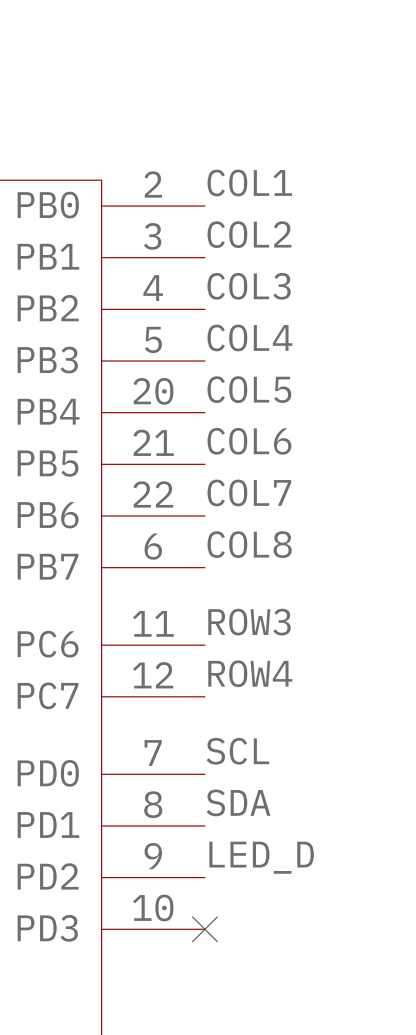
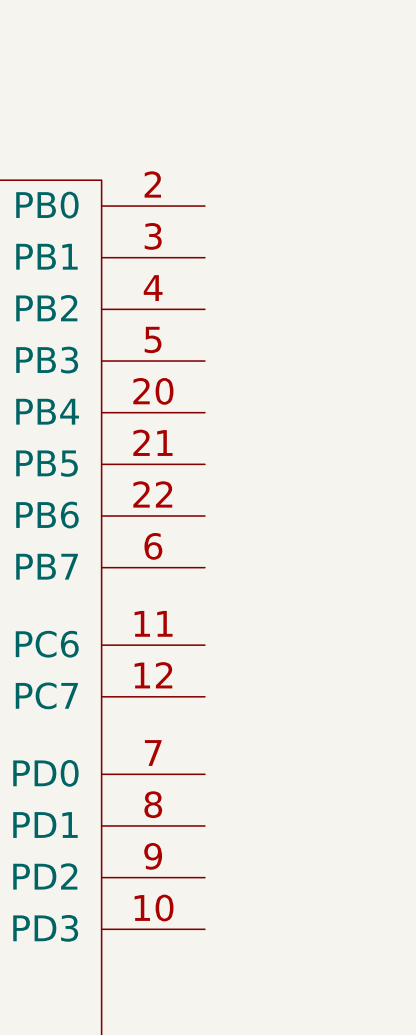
label: COL1 (249, 182) -> none
label: COL2 (249, 234) -> none
label: COL3 (249, 286) -> none
label: COL4 (249, 337) -> none
label: COL5 (249, 389) -> none
label: COL6 (249, 441) -> none
label: COL7 (249, 492) -> none
label: COL8 (249, 544) -> none
label: ROW3 (249, 622) -> none
label: ROW4 (250, 673) -> none
label: SCL (237, 751) -> none
label: SDA (238, 802) -> none
label: LED_D (261, 857) -> none
no-connect mark: (204, 929) -> none

